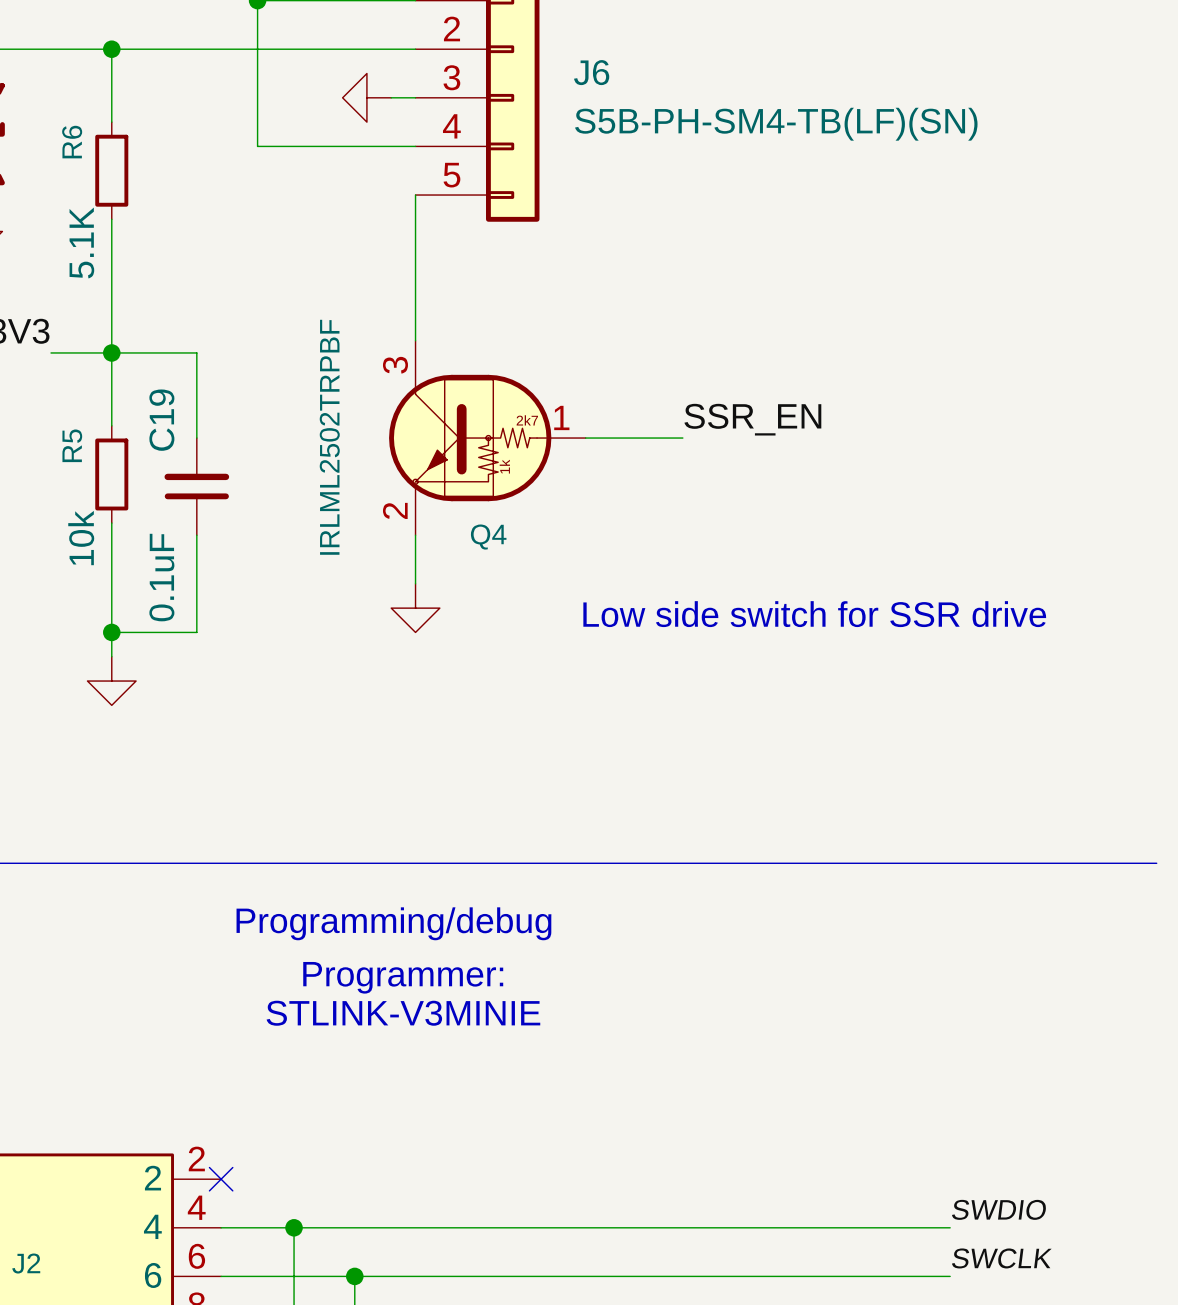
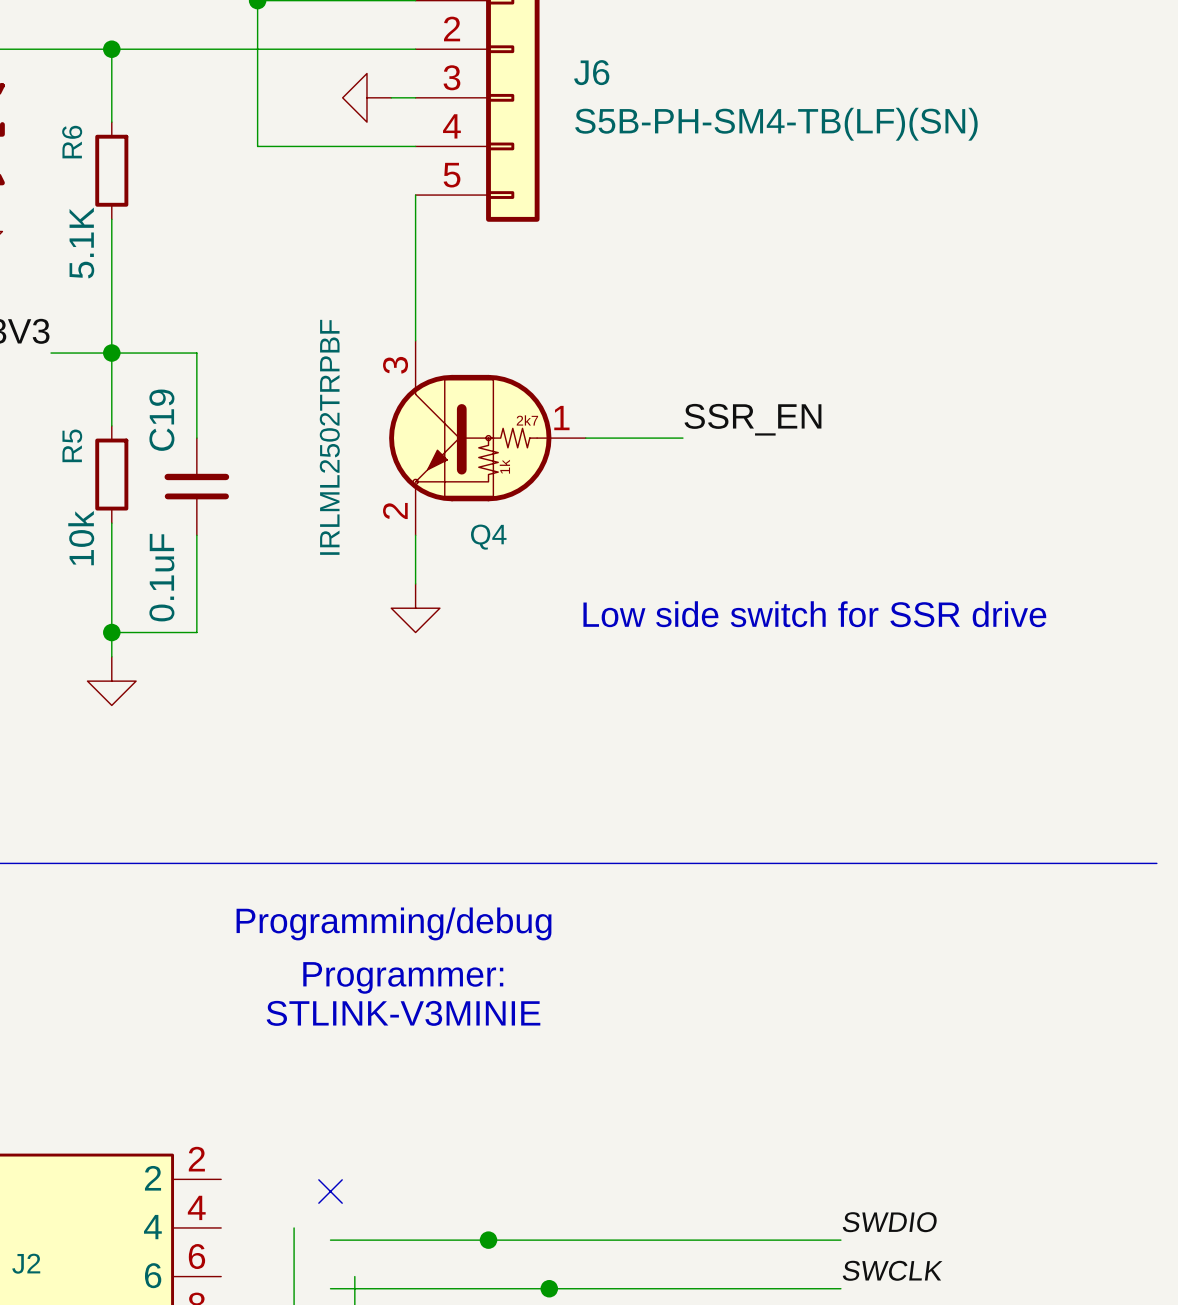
no-connect mark: (221, 1179) -> none
no-connect mark: none -> (330, 1191)
label position: SWDIO (999, 1209) -> SWDIO (889, 1222)
wire: (221, 1227) (950, 1227) -> none
junction: (294, 1227) -> none
wire: none -> (330, 1240) (840, 1240)
junction: none -> (488, 1240)
label position: SWCLK (1001, 1258) -> SWCLK (892, 1270)
wire: (221, 1276) (950, 1276) -> none
junction: (354, 1276) -> none
wire: none -> (330, 1288) (840, 1288)
junction: none -> (549, 1288)

